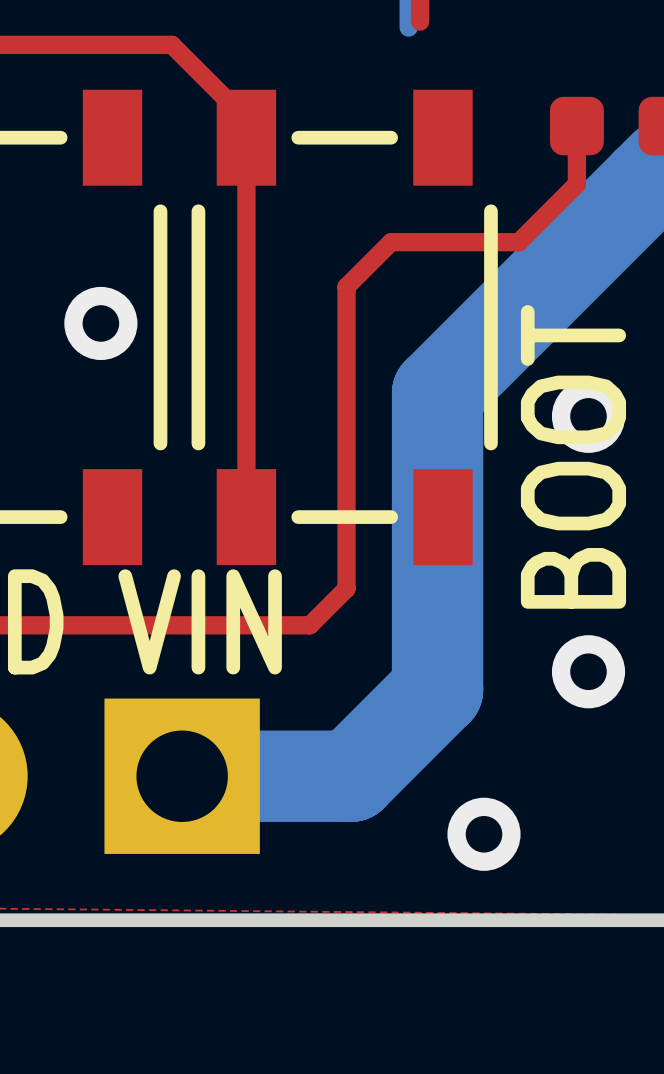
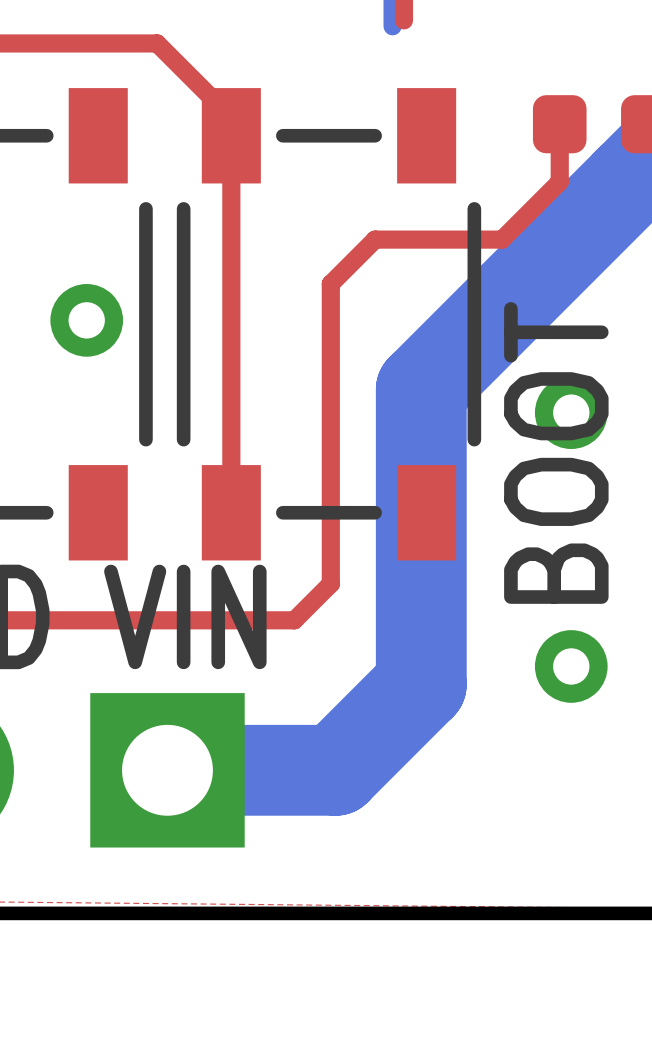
via: (484, 834) -> none

